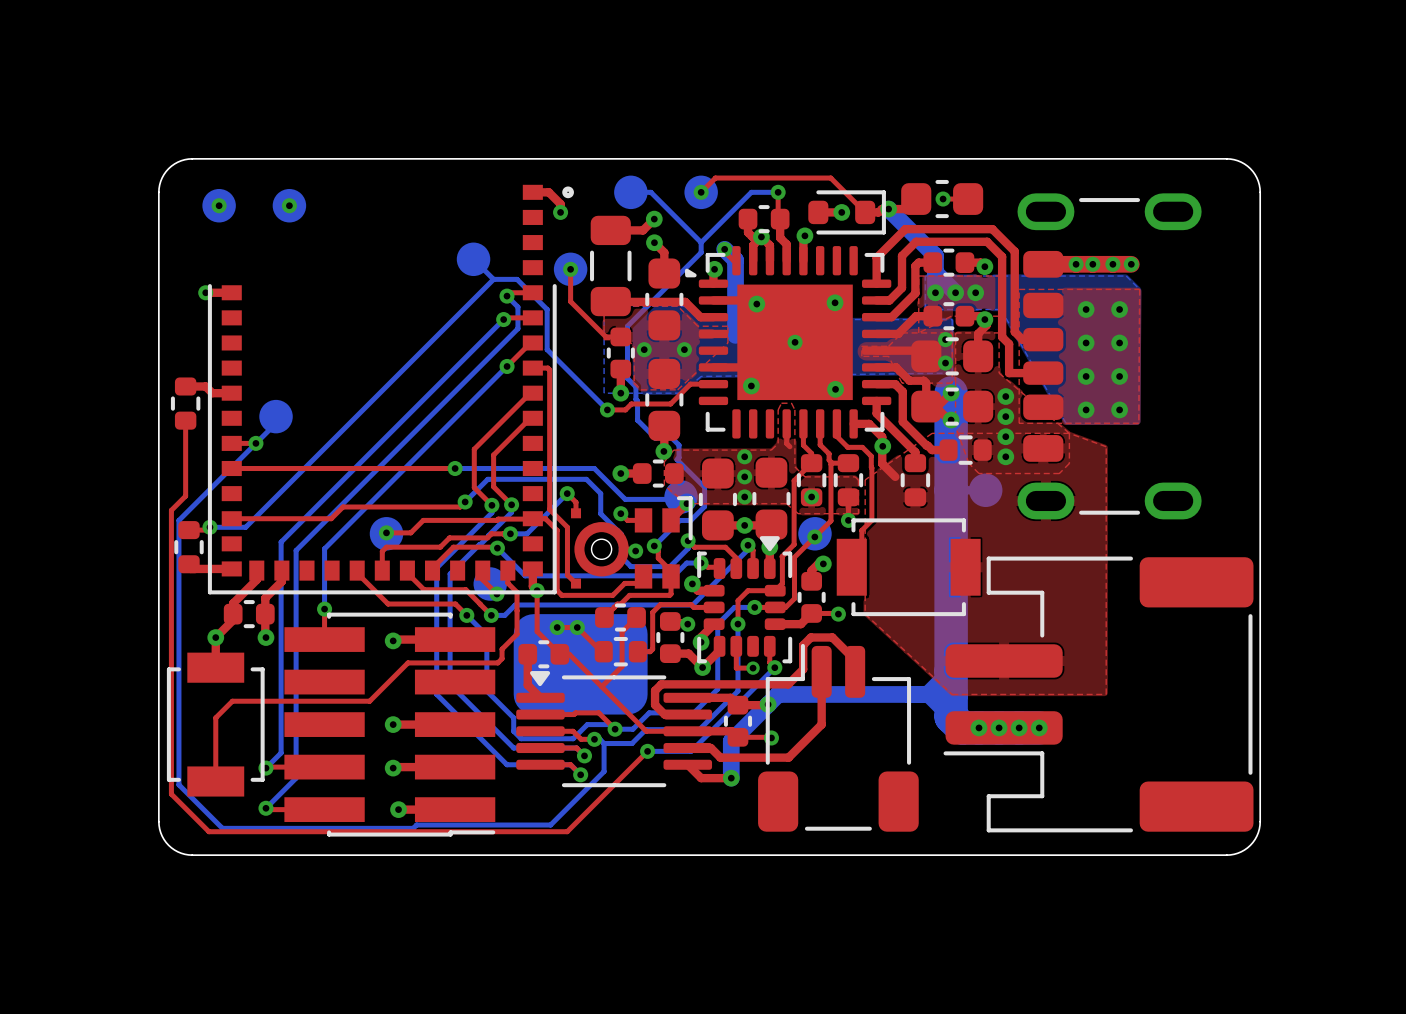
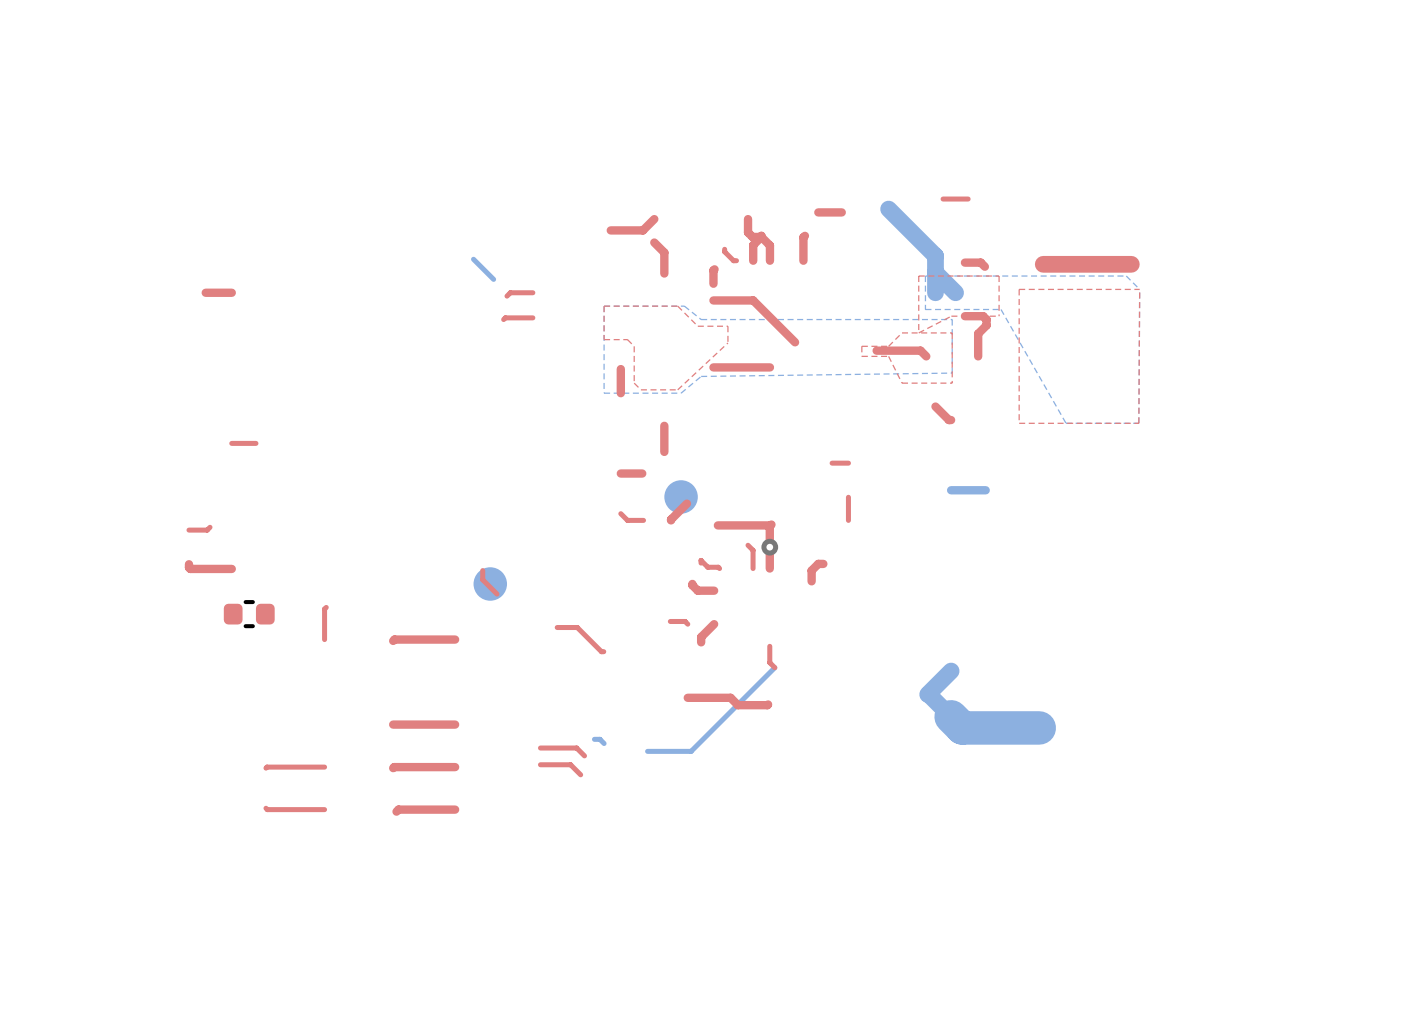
board edge: (192, 158) (1226, 158) (1244, 163) (1256, 177) (1260, 192) (1260, 821) (1255, 839) (1244, 850) (1226, 855) (192, 855) (174, 850) (162, 836) (158, 821) (158, 192) (160, 181) (168, 168) (177, 162) (192, 158) -> none
top track: (532, 192) (548, 192) (560, 204) (560, 212) -> none
bottom track: (630, 192) (650, 192) (701, 242) -> none
part: (630, 192) -> none
top track: (701, 192) (715, 178) (830, 178) (865, 212) (878, 212) (881, 209) (906, 209) (916, 199) -> none
part: (701, 192) -> none
via: (701, 192) -> none
top track: (778, 192) (780, 237) (786, 244) (786, 260) -> none
bottom track: (778, 192) (751, 192) (701, 242) -> none
via: (778, 192) -> none
part: (942, 199) -> none
via: (943, 199) -> none
part: (219, 205) -> none
via: (219, 205) -> none
part: (289, 205) -> none
via: (289, 205) -> none
via: (888, 209) -> none
via: (560, 212) -> none
via: (841, 212) -> none
part: (847, 212) -> none
via: (654, 219) -> none
part: (764, 219) -> none
via: (804, 235) -> none
via: (761, 236) -> none
via: (654, 242) -> none
bottom track: (701, 242) (701, 252) (627, 326) (627, 378) (635, 386) (637, 420) (655, 438) (657, 436) (670, 436) (679, 445) (679, 457) (677, 459) (704, 487) (704, 506) (690, 520) (679, 520) (654, 546) -> none
bottom track: (724, 249) (735, 260) (735, 335) -> none
via: (724, 249) -> none
part: (473, 259) -> none
part: (948, 262) -> none
via: (1076, 264) -> none
via: (1092, 264) -> none
via: (1112, 264) -> none
via: (1131, 264) -> none
part: (610, 265) -> none
top track: (936, 265) (932, 262) (918, 262) (915, 265) (915, 293) (891, 317) (876, 317) -> none
via: (984, 266) -> none
top track: (570, 269) (570, 301) (605, 336) (620, 336) -> none
part: (570, 269) -> none
via: (570, 269) -> none
via: (714, 269) -> none
top track: (876, 283) (876, 257) (905, 229) (992, 229) (1014, 251) (1014, 331) (1022, 339) (1043, 339) -> none
via: (205, 292) -> none
via: (935, 292) -> none
via: (955, 292) -> none
via: (975, 292) -> none
bottom track: (507, 296) (517, 307) (517, 328) (296, 550) (296, 778) (265, 808) -> none
via: (507, 296) -> none
part: (664, 299) -> none
top track: (876, 300) (889, 300) (902, 287) (902, 255) (916, 241) (987, 241) (1002, 256) (1002, 337) (1009, 344) (1009, 373) (1043, 373) -> none
top track: (615, 301) (685, 301) (700, 317) (713, 317) -> none
via: (835, 302) -> none
via: (756, 304) -> none
via: (1086, 309) -> none
via: (1119, 309) -> none
top track: (932, 316) (916, 316) (898, 333) (876, 333) -> none
part: (948, 316) -> none
bottom track: (503, 319) (281, 542) (281, 752) (265, 768) -> none
via: (503, 319) -> none
via: (984, 319) -> none
via: (945, 339) -> none
top track: (532, 342) (530, 342) (507, 366) -> none
part: (788, 342) -> none
via: (795, 342) -> none
via: (1086, 342) -> none
via: (1119, 342) -> none
via: (644, 349) -> none
via: (684, 349) -> none
part: (620, 353) -> none
part: (952, 356) -> none
part: (1109, 356) -> none
via: (945, 363) -> none
bottom track: (507, 366) (324, 548) (324, 609) -> none
via: (507, 366) -> none
top track: (876, 367) (896, 367) (909, 380) (923, 380) (926, 383) (926, 406) (937, 406) (951, 392) -> none
top track: (532, 368) (547, 368) (549, 369) (549, 509) (567, 527) (567, 575) (575, 583) -> none
via: (1086, 376) -> none
via: (1119, 376) -> none
top track: (713, 384) (690, 384) (670, 404) (631, 404) (625, 409) (607, 409) -> none
top track: (876, 384) (895, 384) (902, 391) (902, 421) (932, 450) (948, 450) -> none
via: (751, 385) -> none
top track: (185, 386) (205, 386) (212, 393) (231, 393) -> none
part: (390, 389) -> none
via: (835, 389) -> none
bottom track: (951, 392) (951, 716) -> none
via: (951, 392) -> none
top track: (532, 393) (530, 393) (474, 449) (474, 487) (491, 505) -> none
via: (620, 393) -> none
via: (1005, 396) -> none
part: (664, 399) -> none
top track: (876, 400) (876, 413) (915, 452) (915, 463) -> none
part: (185, 403) -> none
top zone outline: (781, 403) (778, 409) (778, 443) (771, 450) (673, 450) (664, 461) (664, 485) (686, 503) (786, 503) (798, 513) (858, 513) (858, 480) (855, 476) (804, 476) (794, 466) (794, 409) (791, 403) (781, 403) -> none
part: (952, 406) -> none
bottom track: (607, 409) (547, 349) (547, 309) (517, 279) (493, 279) (245, 527) (209, 527) -> none
via: (607, 409) -> none
via: (1086, 409) -> none
via: (1119, 409) -> none
bottom track: (276, 416) (276, 423) (178, 520) (178, 784) (222, 828) (413, 828) (416, 825) (550, 825) (604, 771) (604, 743) (632, 743) (645, 729) (699, 729) (737, 691) (737, 624) -> none
part: (276, 416) -> none
via: (1005, 416) -> none
top track: (532, 418) (530, 418) (493, 455) (493, 486) (511, 504) -> none
top track: (185, 420) (185, 496) (171, 510) (171, 794) (208, 831) (567, 831) (647, 751) -> none
via: (951, 420) -> none
top track: (786, 423) (786, 443) (789, 446) -> none
top track: (803, 423) (803, 445) (811, 453) (811, 463) (794, 480) (794, 544) (782, 556) -> none
top track: (820, 423) (820, 444) (829, 453) (829, 460) (832, 463) (830, 520) (794, 557) (794, 598) (785, 607) (754, 607) -> none
top track: (836, 423) (836, 436) (847, 447) (862, 447) (871, 456) (871, 520) (861, 530) (861, 567) -> none
top track: (853, 423) (869, 423) (882, 437) (882, 463) (895, 476) -> none
top zone outline: (1069, 433) (999, 373) (999, 332) (955, 332) (955, 426) (968, 463) (979, 473) (1059, 473) (1069, 463) (1069, 433) -> none
top zone outline: (1069, 433) (1106, 446) (1106, 694) (952, 694) (865, 614) (865, 479) (932, 433) (1069, 433) -> none
via: (1005, 436) -> none
via: (255, 443) -> none
via: (882, 446) -> none
part: (965, 450) -> none
via: (663, 451) -> none
via: (744, 456) -> none
via: (1005, 456) -> none
top track: (456, 466) (455, 468) (231, 468) -> none
bottom track: (455, 468) (594, 468) (625, 499) (682, 499) (686, 503) -> none
via: (455, 468) -> none
via: (620, 473) -> none
part: (658, 473) -> none
via: (744, 476) -> none
part: (811, 480) -> none
part: (848, 480) -> none
part: (915, 480) -> none
part: (985, 490) -> none
top track: (567, 493) (575, 502) (575, 513) -> none
bottom track: (567, 493) (527, 533) (510, 533) -> none
via: (567, 493) -> none
via: (744, 496) -> none
via: (811, 496) -> none
part: (771, 498) -> none
part: (717, 499) -> none
top track: (465, 501) (460, 507) (342, 507) (331, 518) (231, 518) -> none
bottom track: (465, 501) (487, 479) (586, 479) (600, 493) (600, 513) (621, 534) (621, 556) (630, 566) (670, 566) (688, 548) (688, 540) -> none
via: (465, 501) -> none
via: (686, 503) -> none
bottom track: (511, 504) (511, 512) (450, 573) (450, 684) (513, 748) (576, 748) (584, 755) -> none
via: (511, 504) -> none
bottom track: (491, 505) (491, 512) (436, 568) (436, 694) (507, 764) (570, 764) (580, 774) -> none
via: (491, 505) -> none
via: (620, 513) -> none
top track: (532, 518) (545, 518) (557, 530) (557, 590) (561, 595) (612, 595) (624, 583) (636, 583) (643, 576) -> none
top track: (532, 519) (423, 520) (410, 532) (386, 532) -> none
via: (848, 520) -> none
via: (744, 525) -> none
via: (209, 527) -> none
via: (386, 532) -> none
part: (386, 533) -> none
top track: (510, 533) (506, 537) (503, 533) (491, 533) (487, 537) (449, 537) (440, 547) (386, 547) (382, 551) (382, 570) -> none
via: (510, 533) -> none
part: (814, 533) -> none
via: (814, 536) -> none
top track: (688, 540) (694, 547) (725, 547) (736, 558) (736, 568) -> none
via: (688, 540) -> none
part: (631, 542) -> none
bottom track: (748, 545) (748, 549) (692, 604) (515, 604) (504, 615) (491, 615) -> none
via: (748, 545) -> none
top track: (654, 546) (658, 551) (658, 558) (666, 566) (671, 567) (671, 594) (629, 595) (604, 617) -> none
via: (654, 546) -> none
part: (188, 547) -> none
top track: (496, 547) (453, 547) (432, 568) (432, 570) -> none
bottom track: (497, 548) (525, 575) (673, 575) (686, 563) (701, 563) -> none
via: (497, 548) -> none
via: (635, 551) -> none
top track: (782, 556) (782, 583) (775, 590) (748, 590) (738, 600) (738, 624) -> none
via: (701, 563) -> none
via: (823, 563) -> none
part: (908, 567) -> none
top track: (532, 568) (532, 586) (537, 590) (537, 631) (559, 654) (569, 654) (646, 731) (731, 731) (737, 737) (771, 737) -> none
top track: (256, 570) (256, 579) (233, 603) (233, 620) (215, 637) (215, 667) -> none
top track: (281, 570) (281, 581) (265, 598) (265, 637) -> none
top track: (357, 570) (357, 573) (388, 604) (455, 604) (466, 615) -> none
top track: (407, 570) (407, 573) (424, 589) (465, 589) (491, 615) -> none
top track: (507, 570) (507, 583) (517, 592) (517, 634) (502, 649) (502, 658) (497, 662) (407, 662) (369, 701) (232, 701) (215, 717) (215, 781) -> none
via: (692, 583) -> none
via: (537, 590) -> none
via: (496, 594) -> none
part: (811, 597) -> none
part: (744, 599) -> none
top track: (714, 607) (693, 607) (691, 604) (660, 604) (652, 612) (652, 649) (650, 651) (637, 651) -> none
bottom track: (754, 607) (734, 607) (717, 624) (717, 689) (693, 712) (649, 712) (632, 729) (615, 729) (610, 724) (587, 724) (573, 738) (521, 738) (513, 731) (513, 717) (486, 691) (486, 635) (466, 615) -> none
via: (754, 607) -> none
via: (324, 609) -> none
top track: (838, 614) (811, 613) (800, 624) (775, 624) -> none
via: (838, 614) -> none
via: (466, 615) -> none
via: (491, 615) -> none
part: (620, 617) -> none
top track: (636, 617) (622, 631) (622, 666) (601, 686) -> none
via: (687, 624) -> none
via: (737, 624) -> none
via: (557, 627) -> none
via: (577, 627) -> none
via: (215, 637) -> none
via: (265, 637) -> none
part: (670, 637) -> none
via: (393, 640) -> none
via: (701, 642) -> none
top track: (719, 646) (719, 650) (702, 667) (688, 653) (670, 653) -> none
top track: (736, 646) (736, 668) (753, 668) -> none
part: (620, 651) -> none
top track: (527, 654) (527, 685) (540, 697) -> none
part: (543, 654) -> none
part: (580, 664) -> none
via: (702, 667) -> none
via: (774, 667) -> none
via: (753, 668) -> none
top track: (821, 671) (821, 724) (788, 757) (720, 757) (710, 748) (687, 748) -> none
top track: (855, 671) (855, 660) (832, 637) (810, 637) (803, 645) (803, 669) (788, 684) (661, 684) (655, 690) (655, 704) (664, 714) (687, 714) -> none
bottom track: (951, 694) (778, 694) (731, 741) (731, 778) -> none
part: (1098, 694) -> none
via: (768, 704) -> none
top track: (540, 714) (598, 712) (615, 729) -> none
part: (737, 721) -> none
part: (215, 724) -> none
part: (389, 724) -> none
via: (393, 724) -> none
via: (979, 727) -> none
via: (999, 727) -> none
via: (1019, 727) -> none
via: (1039, 727) -> none
part: (614, 729) -> none
via: (615, 729) -> none
top track: (540, 731) (573, 731) (581, 739) (594, 739) -> none
via: (771, 737) -> none
part: (838, 737) -> none
via: (594, 739) -> none
via: (647, 751) -> none
via: (584, 755) -> none
top track: (687, 764) (701, 778) (731, 778) -> none
via: (265, 768) -> none
via: (393, 768) -> none
via: (580, 774) -> none
via: (731, 778) -> none
via: (265, 808) -> none
via: (398, 809) -> none

